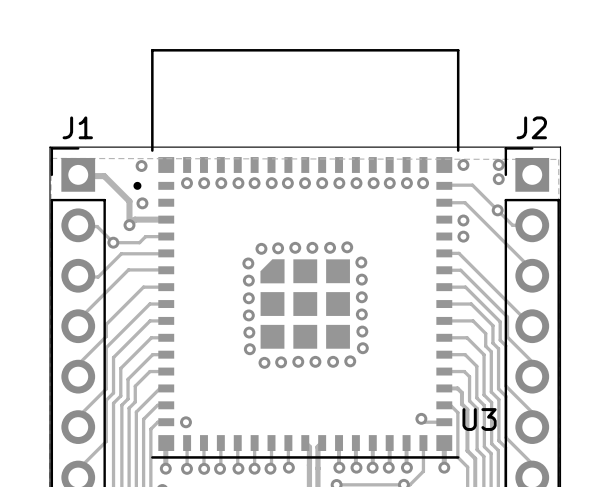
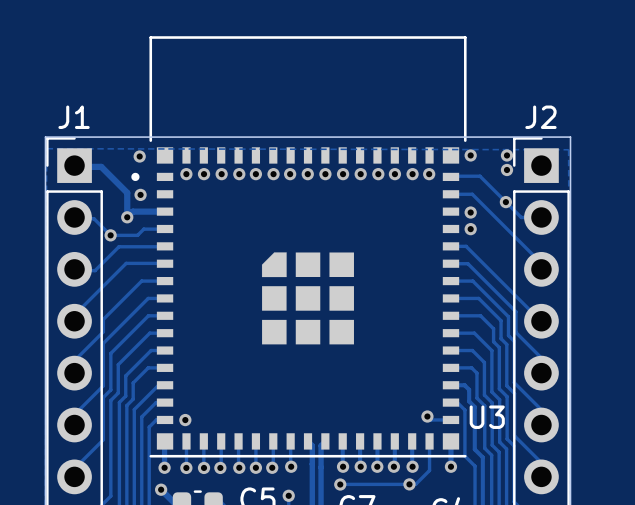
via: (295, 247) -> none
via: (312, 247) -> none
via: (330, 247) -> none
via: (347, 247) -> none
via: (261, 248) -> none
via: (278, 248) -> none
via: (361, 262) -> none
via: (248, 263) -> none
via: (361, 279) -> none
via: (248, 280) -> none
via: (361, 297) -> none
via: (248, 298) -> none
via: (361, 314) -> none
via: (248, 315) -> none
via: (362, 331) -> none
via: (249, 332) -> none
via: (362, 348) -> none
via: (249, 349) -> none
via: (298, 361) -> none
via: (315, 361) -> none
via: (333, 361) -> none
via: (350, 361) -> none
via: (264, 362) -> none
via: (281, 362) -> none

